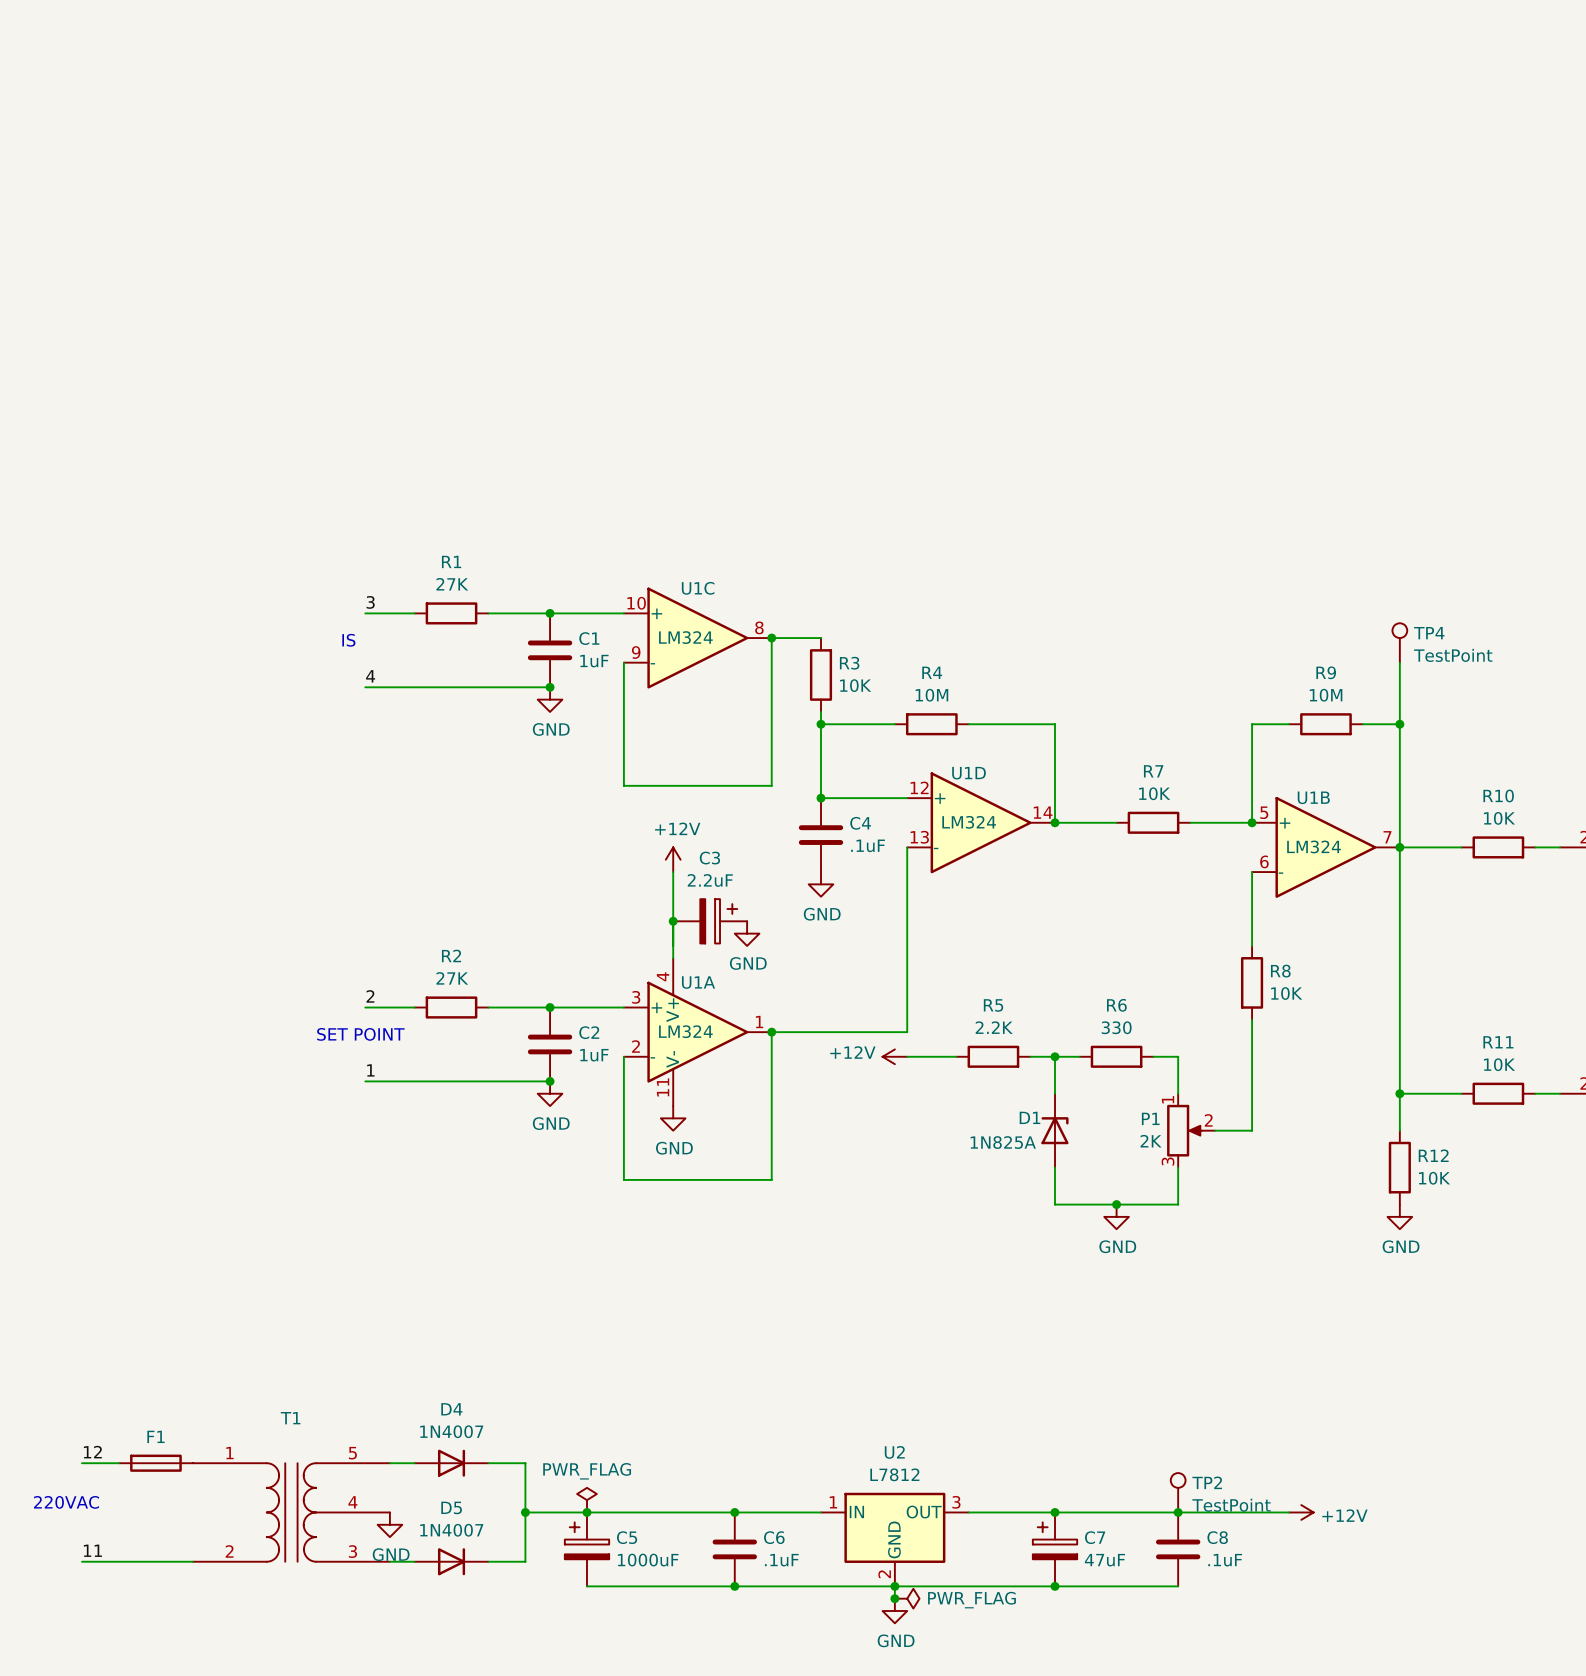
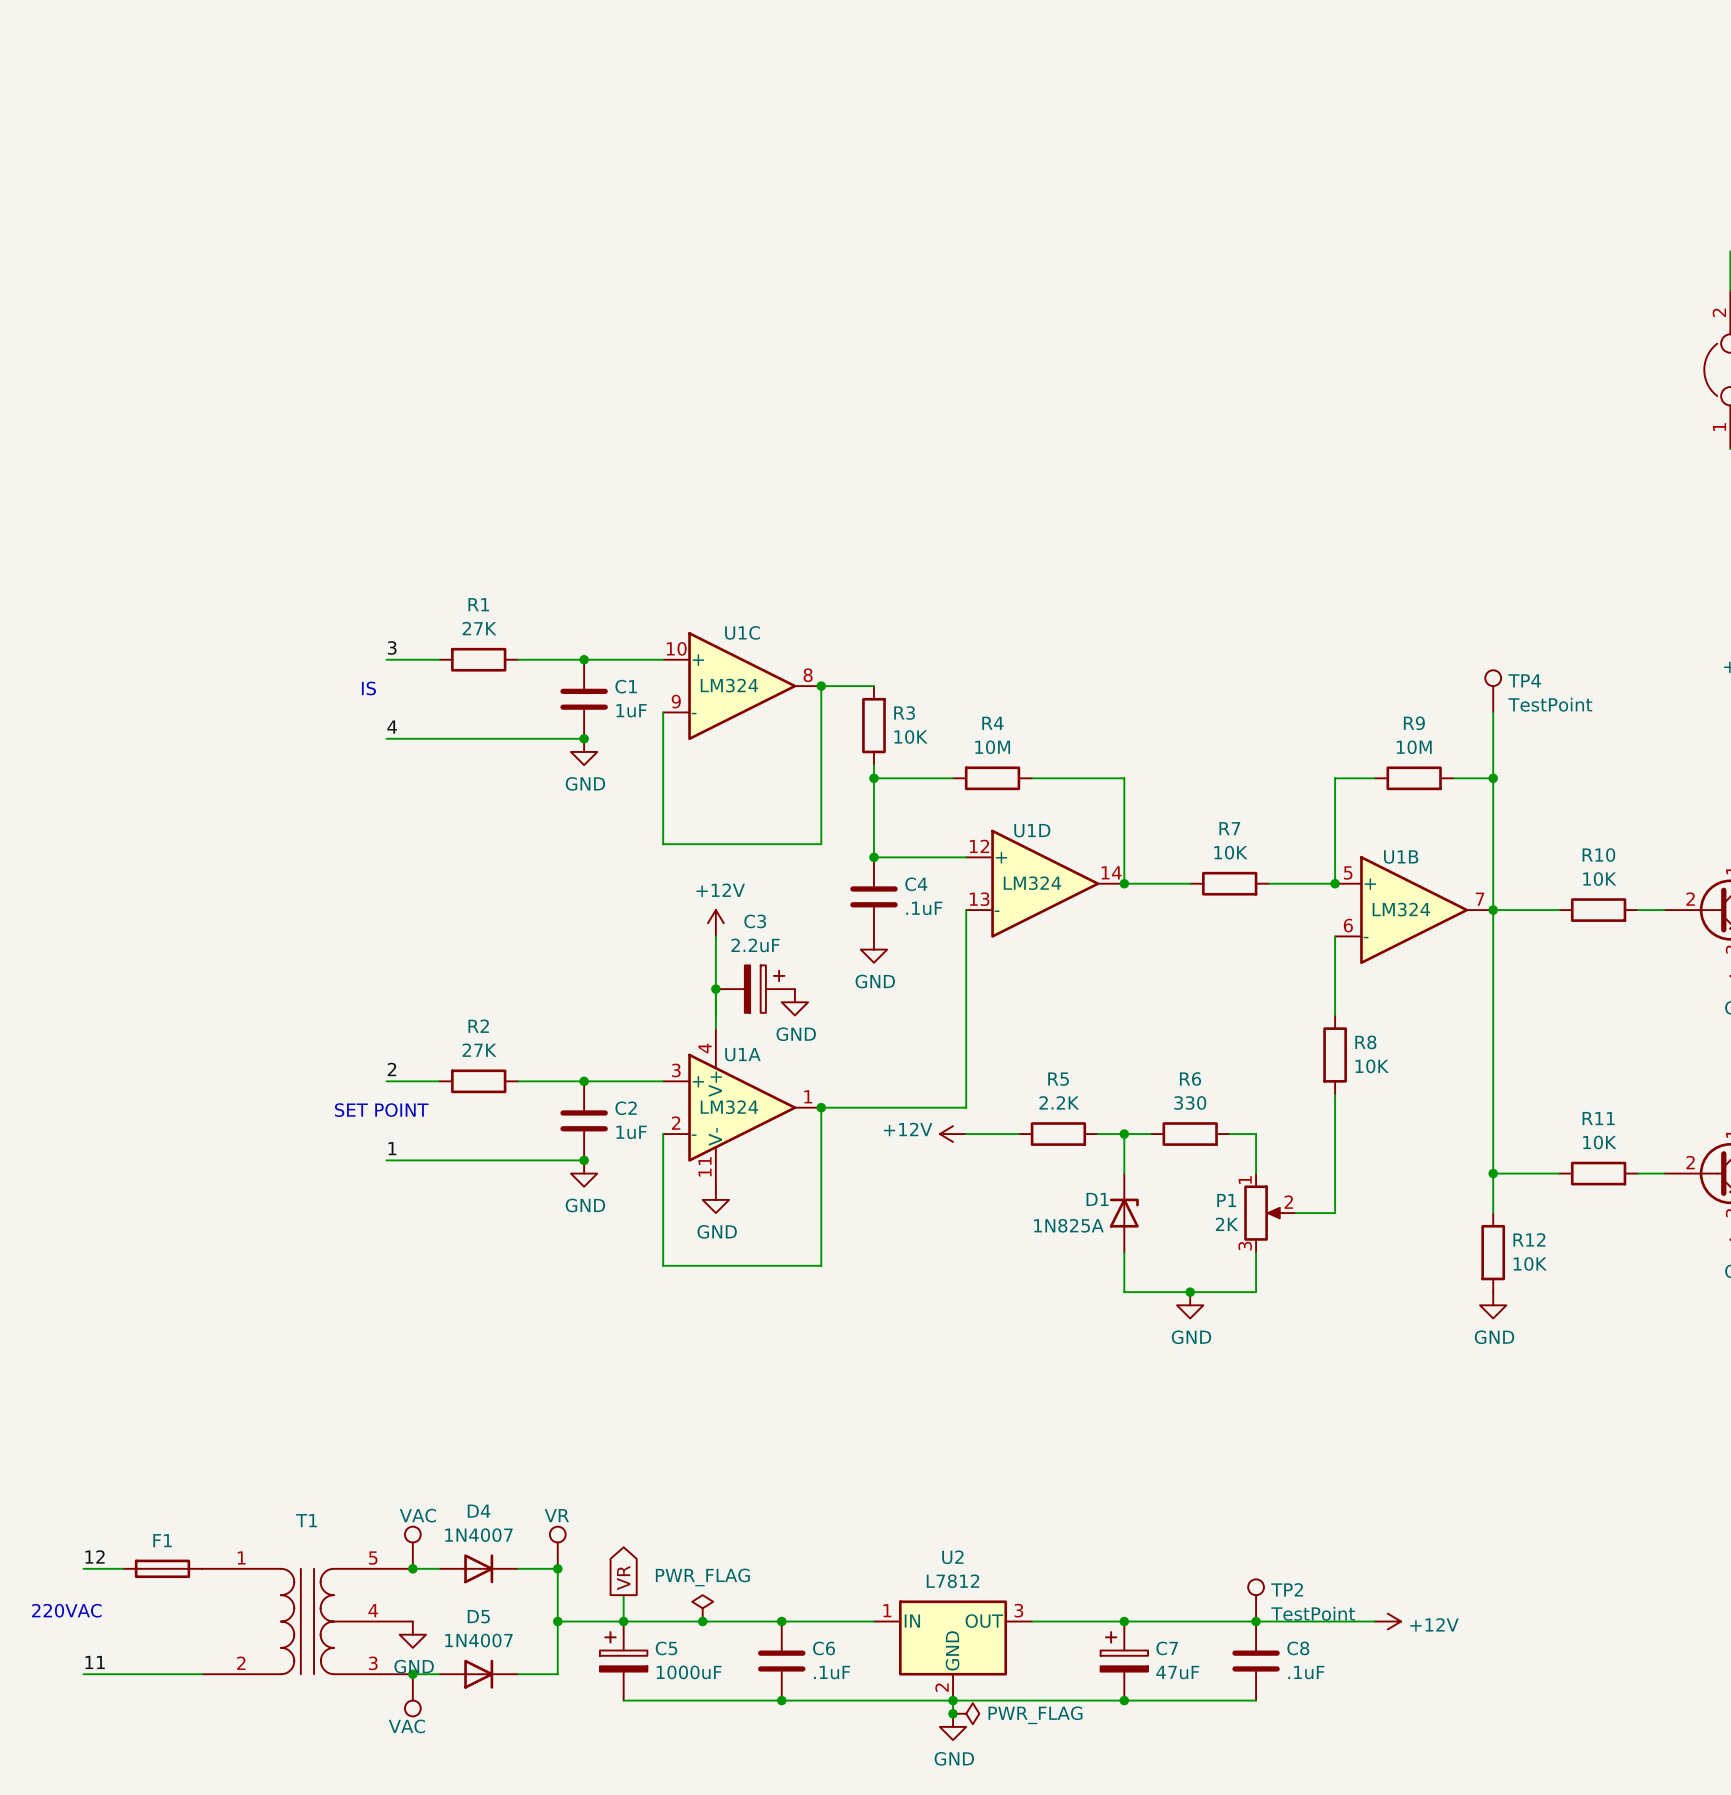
part: none -> VAC (412, 1547)
part: none -> VR (557, 1547)
junction: none -> (412, 1568)
junction: none -> (557, 1568)
global label: none -> VR (623, 1577)
power symbol position: PWR_FLAG (586, 1500) -> PWR_FLAG (702, 1608)
junction: none -> (702, 1621)
junction: none -> (412, 1674)
part: none -> VAC (412, 1695)

